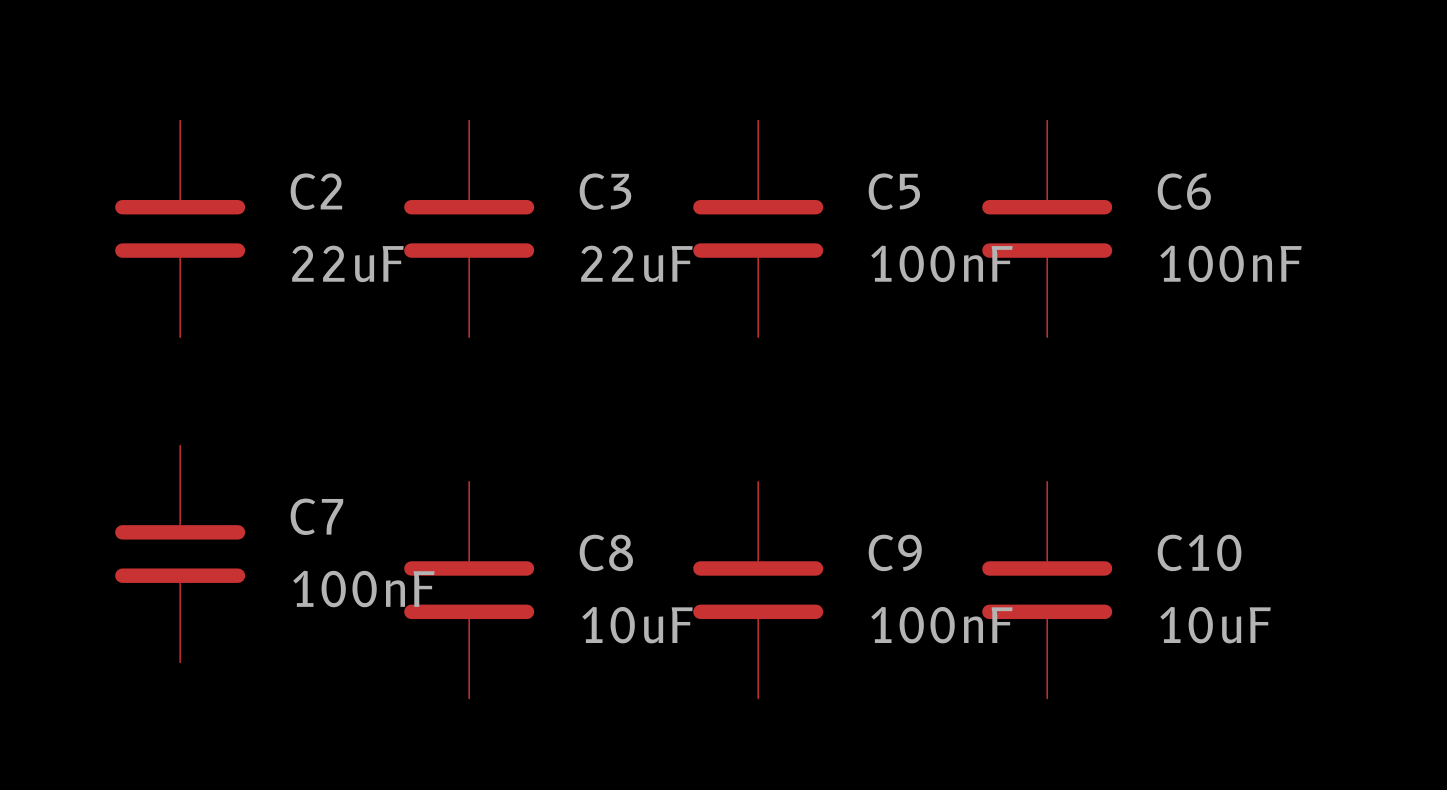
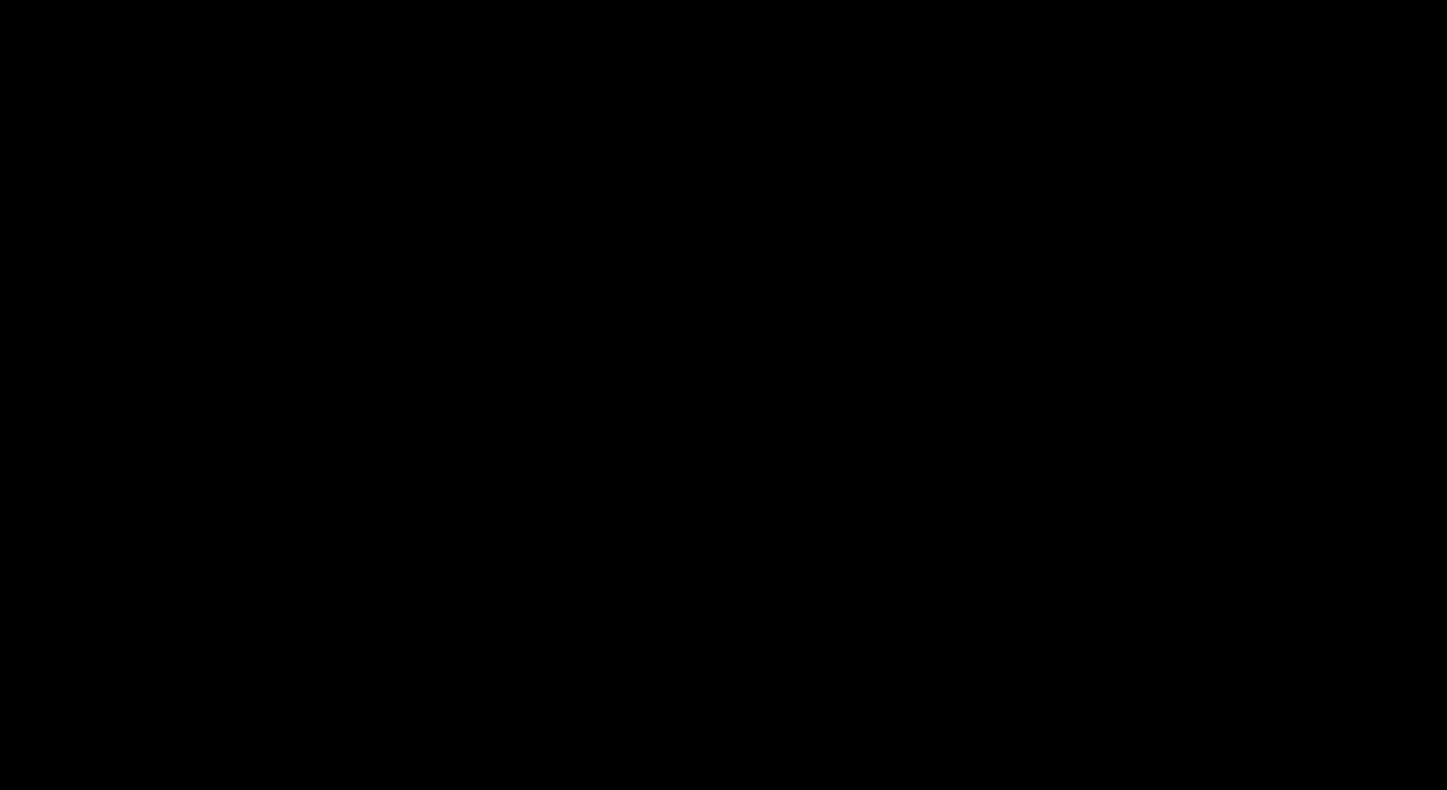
C2: 22uF (180, 228) -> none
C3: 22uF (469, 228) -> none
C5: 100nF (758, 228) -> none
C6: 100nF (1047, 228) -> none
C7: 100nF (180, 554) -> none
C8: 10uF (469, 590) -> none
C9: 100nF (758, 590) -> none
C10: 10uF (1047, 590) -> none

